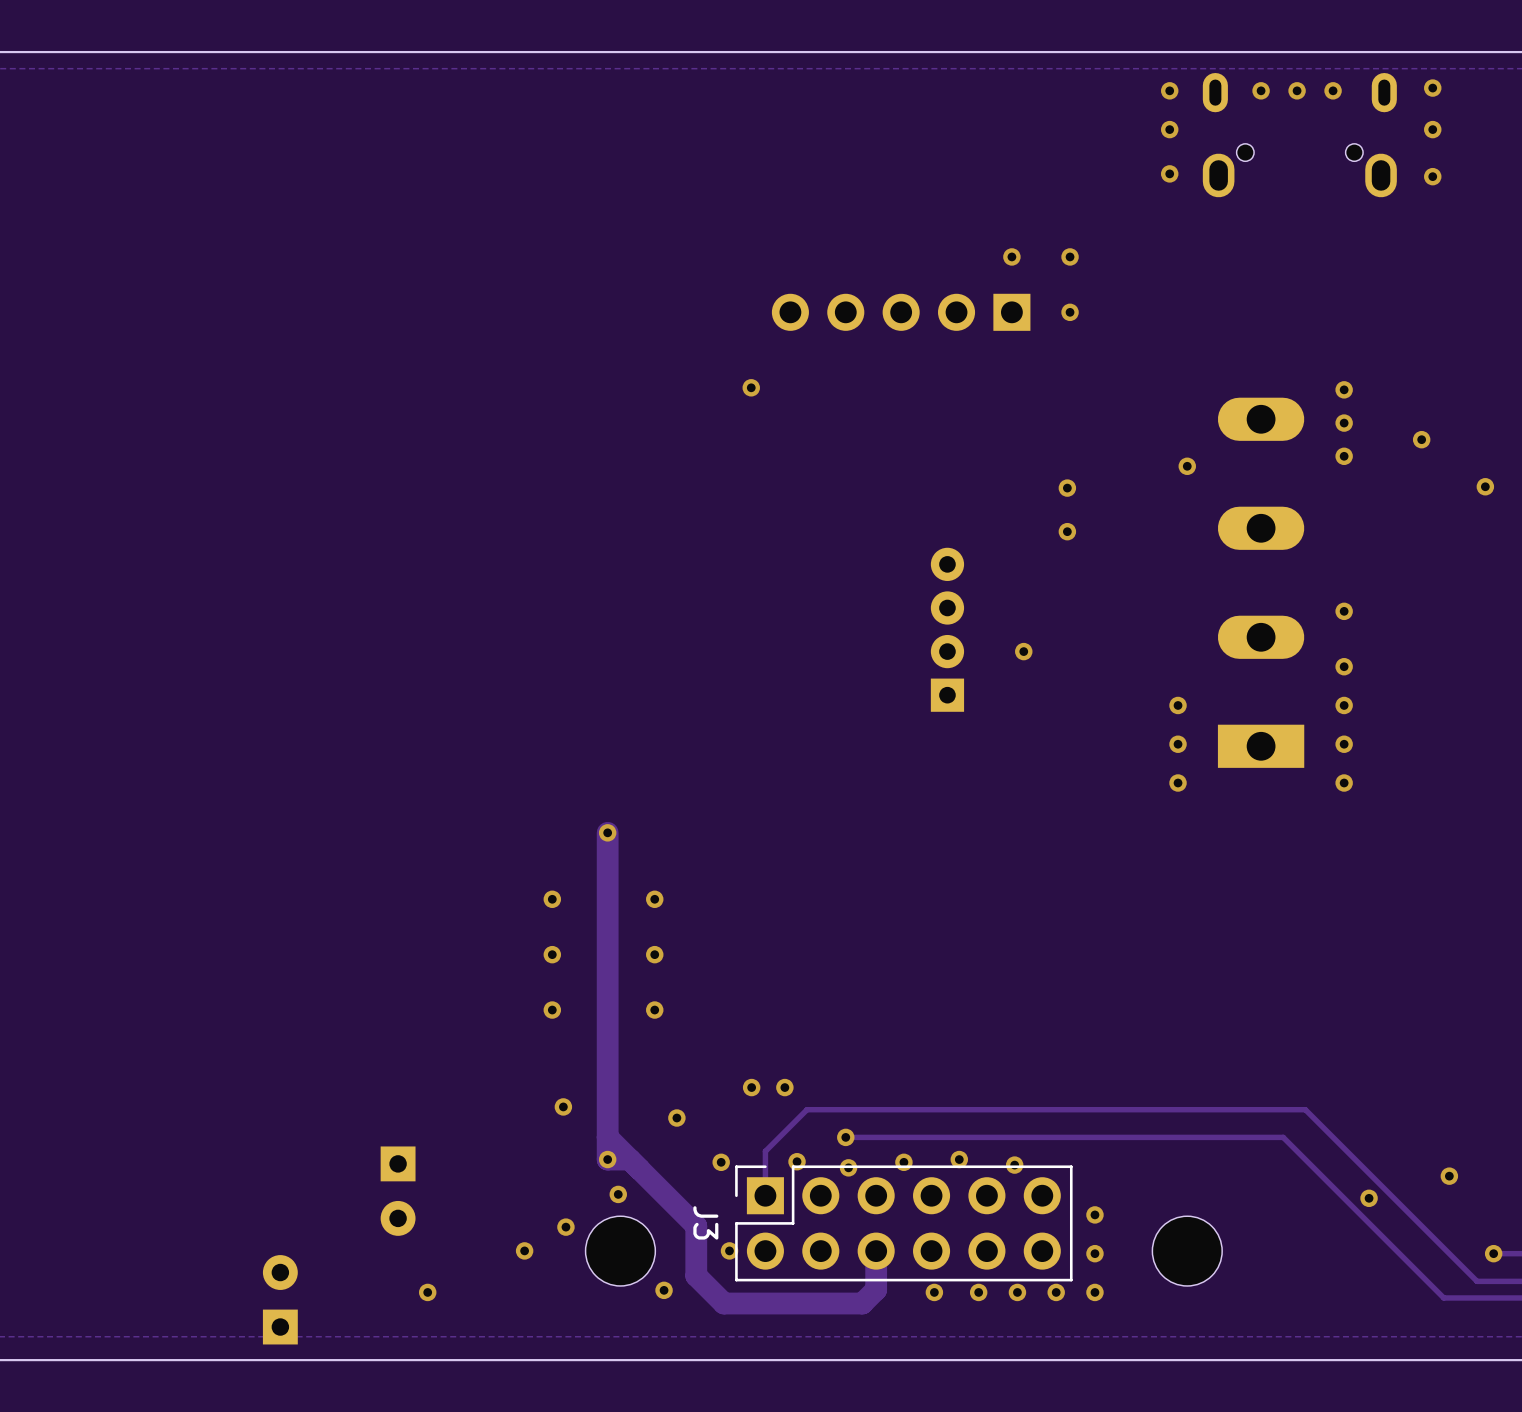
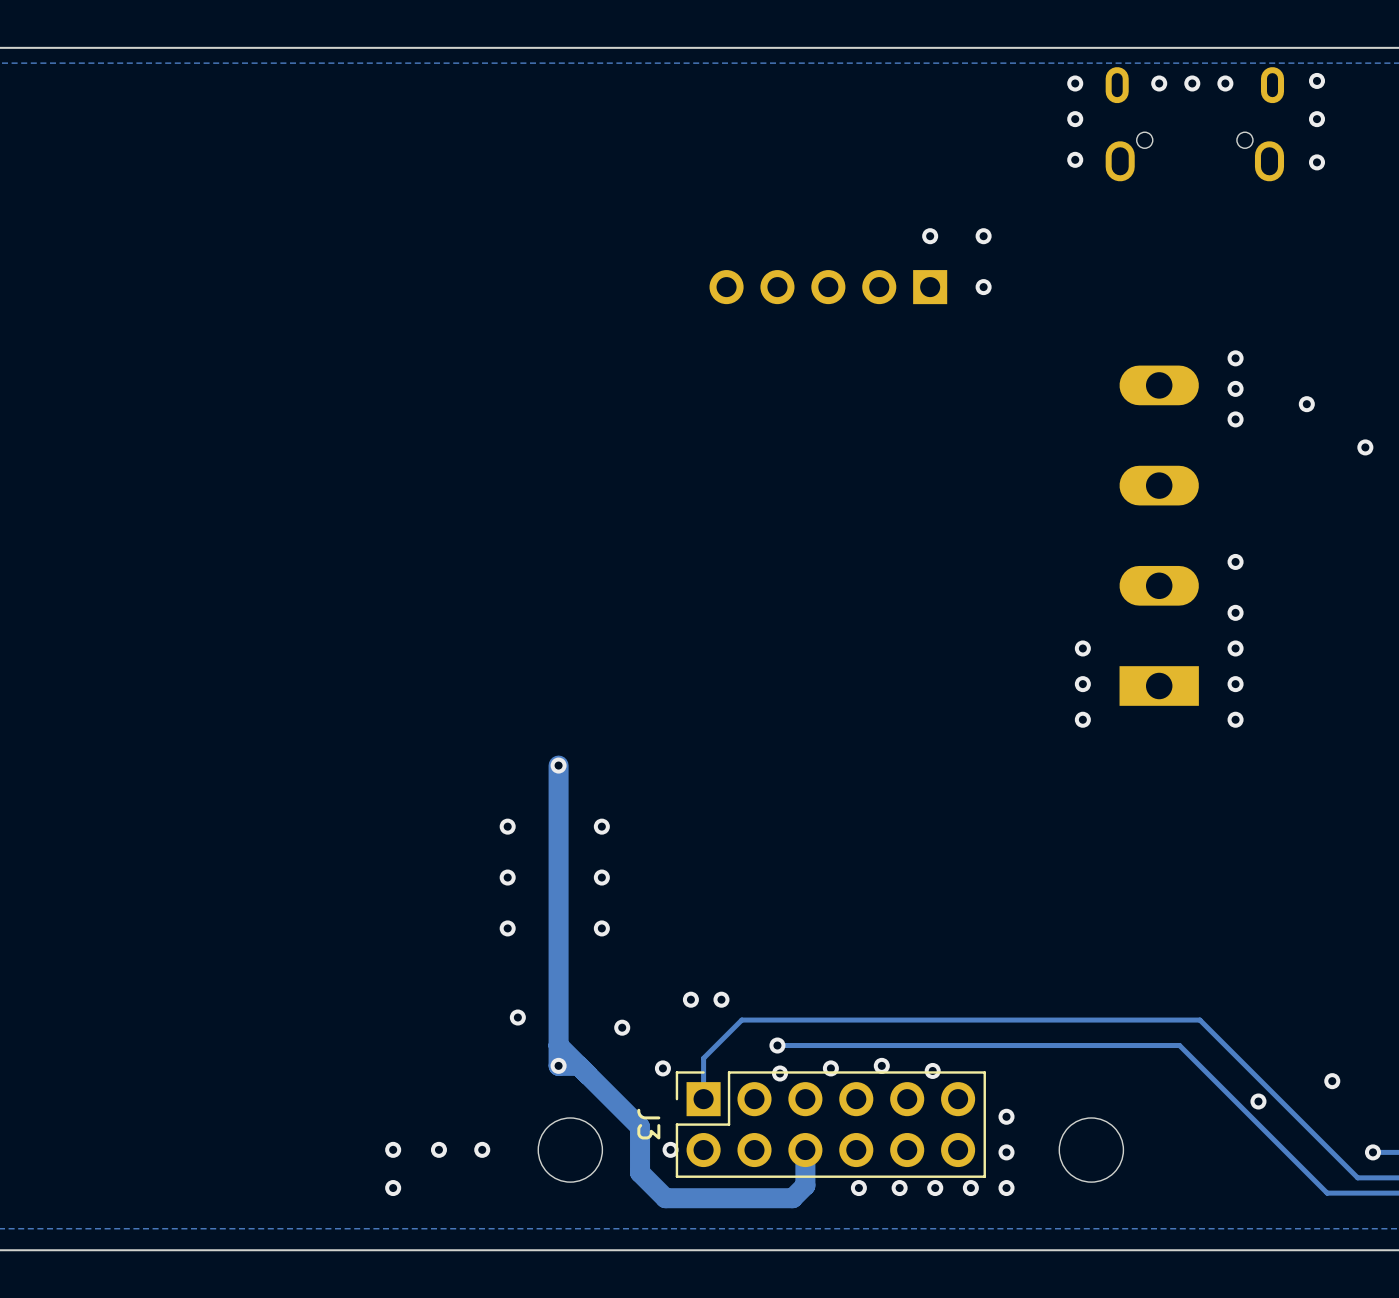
via: (751, 387) -> none
via: (1187, 466) -> none
via: (1067, 488) -> none
via: (1067, 531) -> none
part: (947, 629) -> none
via: (1023, 651) -> none
via: (797, 1161) -> none
part: (398, 1191) -> none
via: (618, 1194) -> none
via: (565, 1227) -> none
via: none -> (393, 1149)
via: none -> (438, 1149)
via: (664, 1290) -> none
part: (280, 1299) -> none

